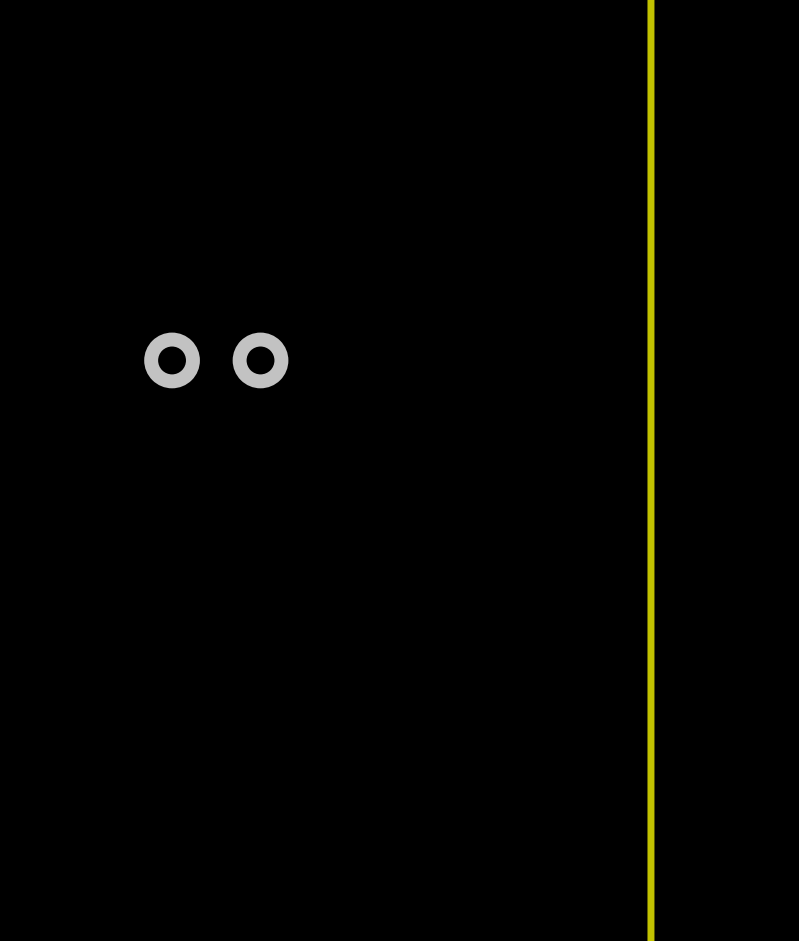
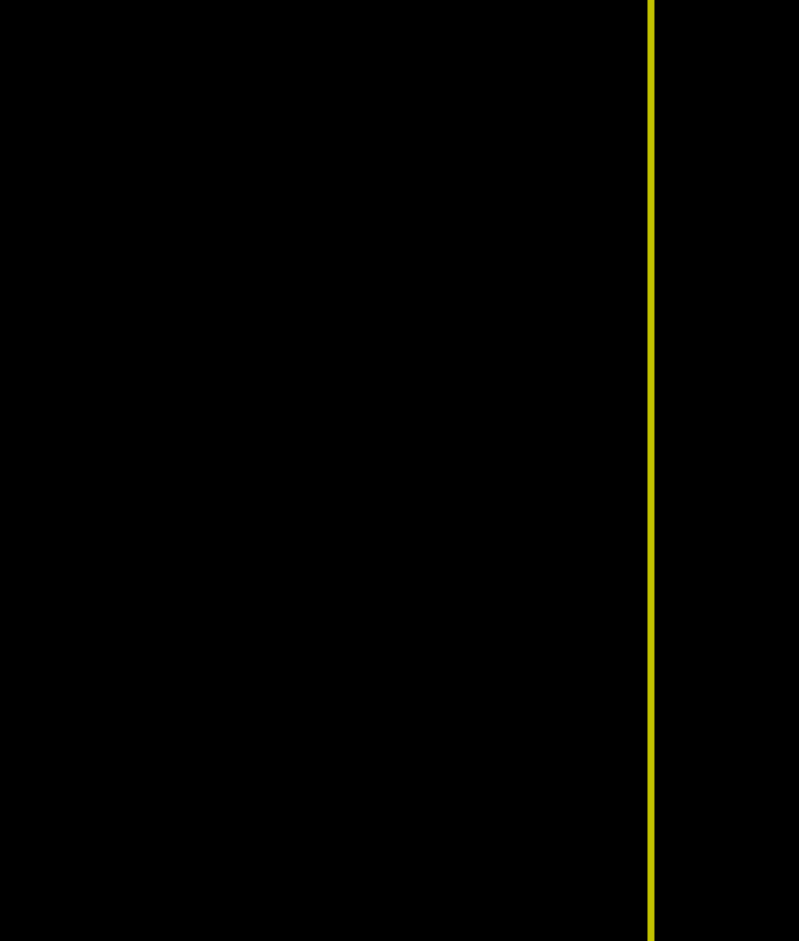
via: (172, 360) -> none
via: (260, 360) -> none

